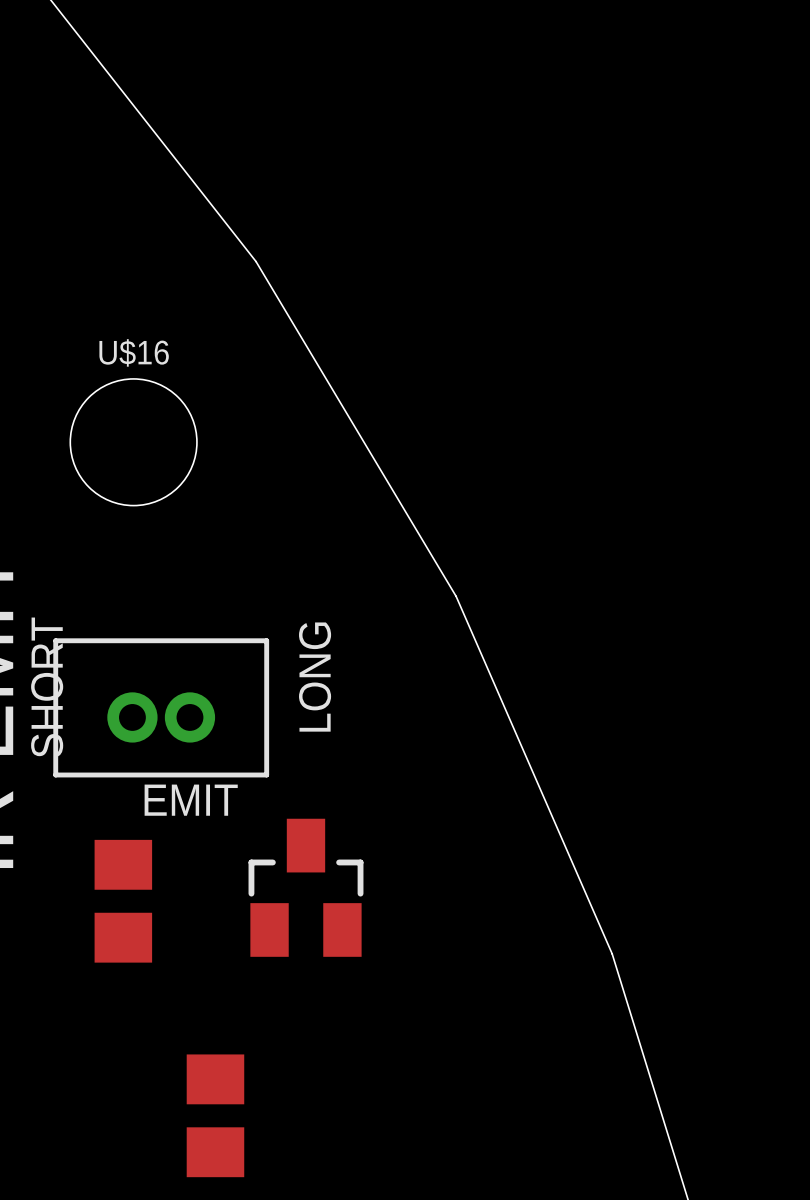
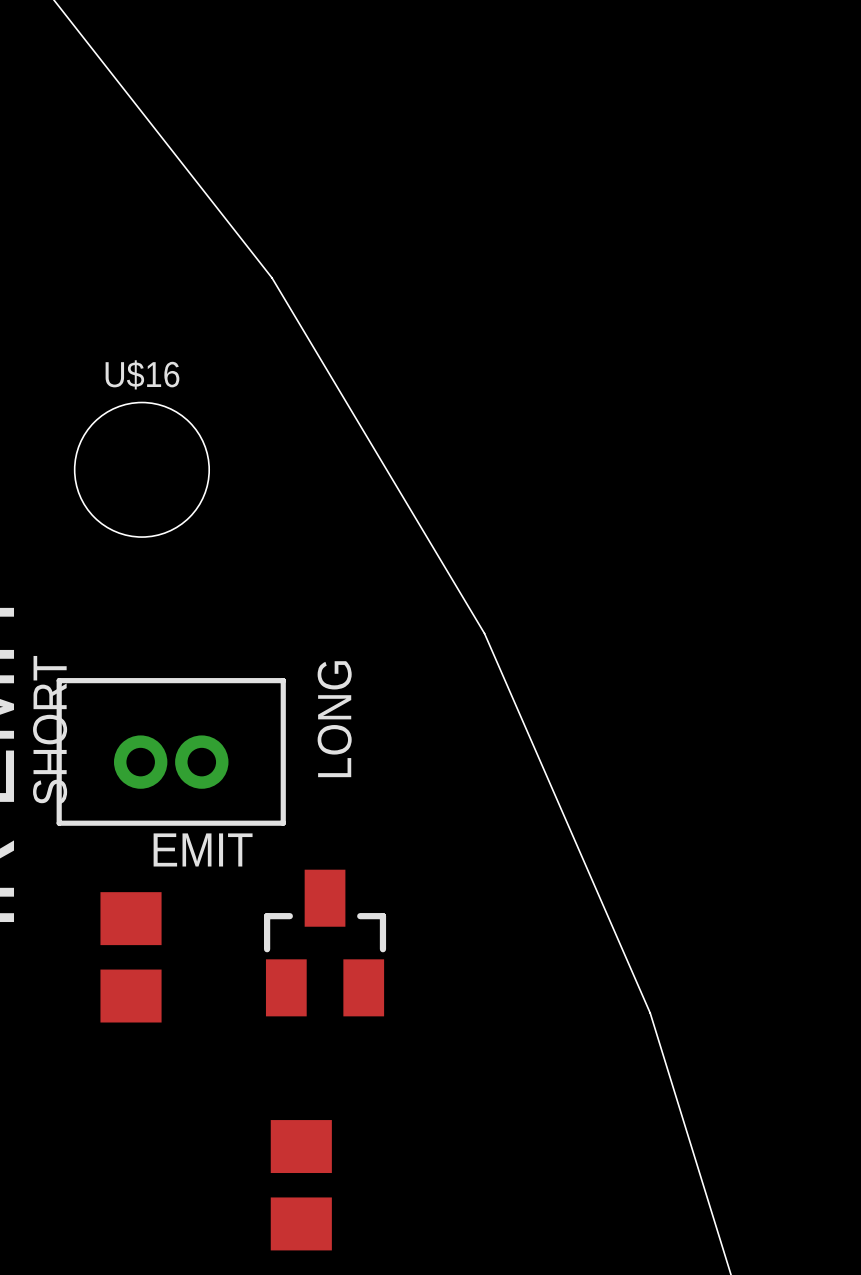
part position: (215, 1115) -> (301, 1185)

